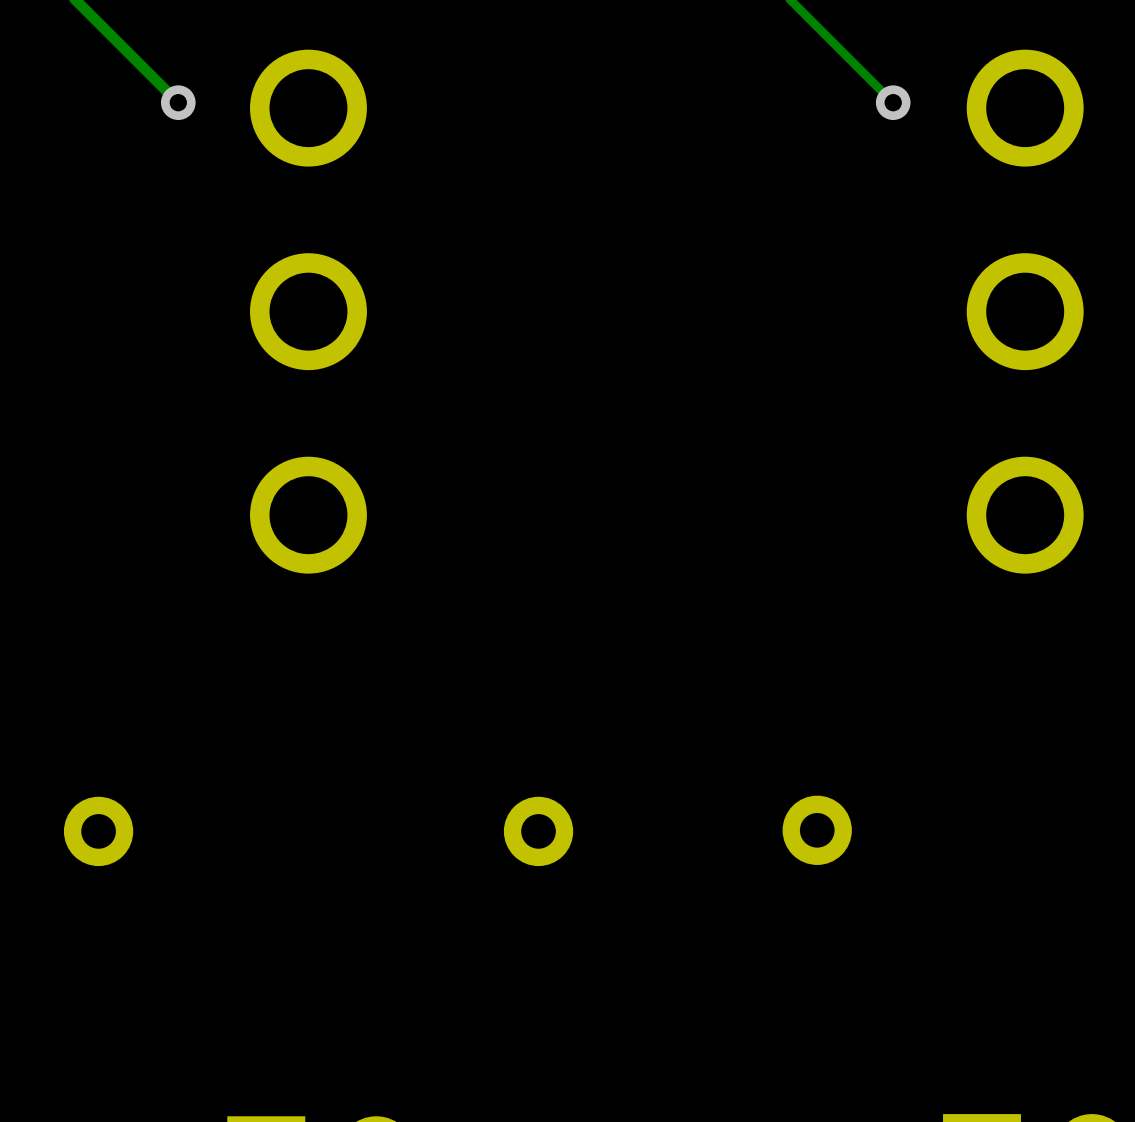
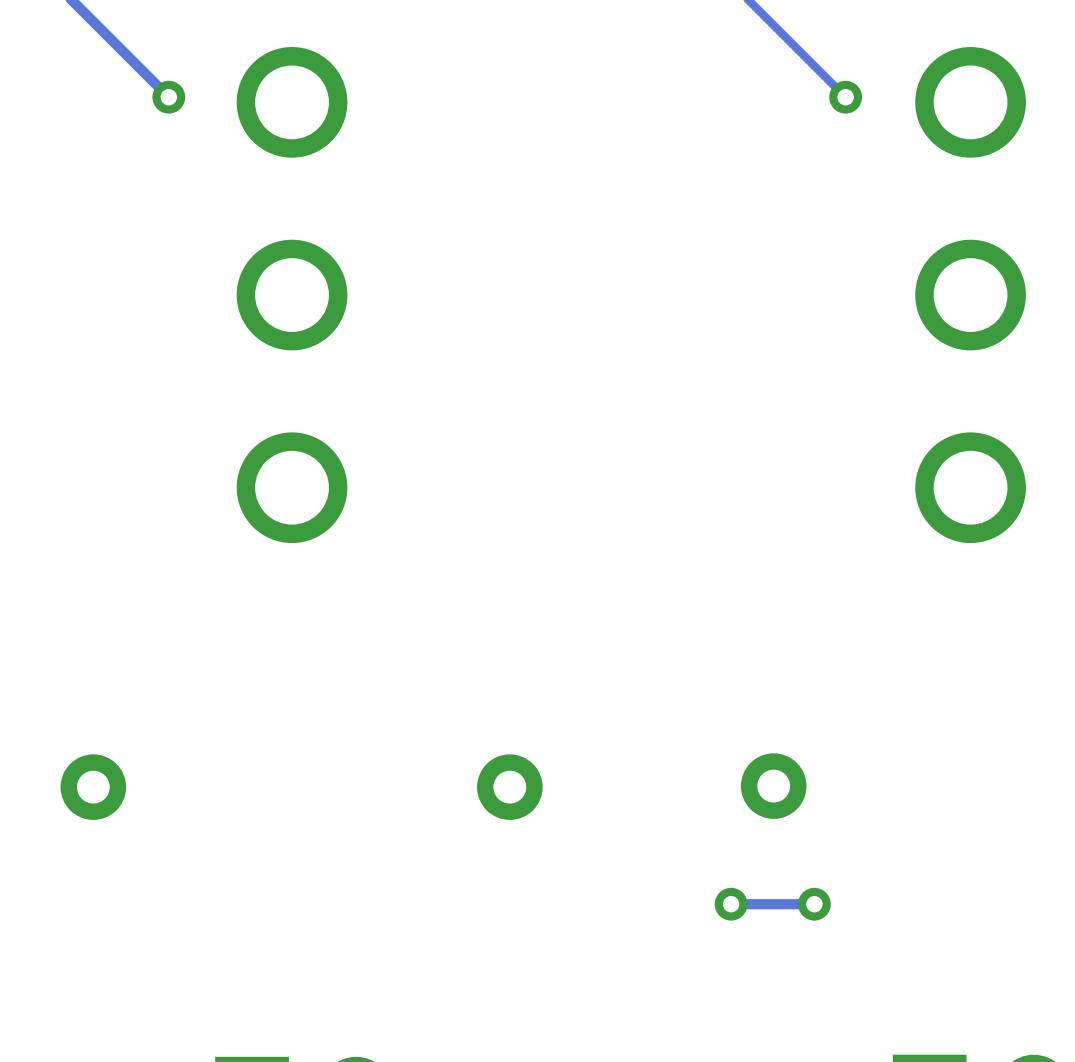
via: none -> (731, 904)
track: none -> (814, 904) (731, 904)
via: none -> (814, 904)

